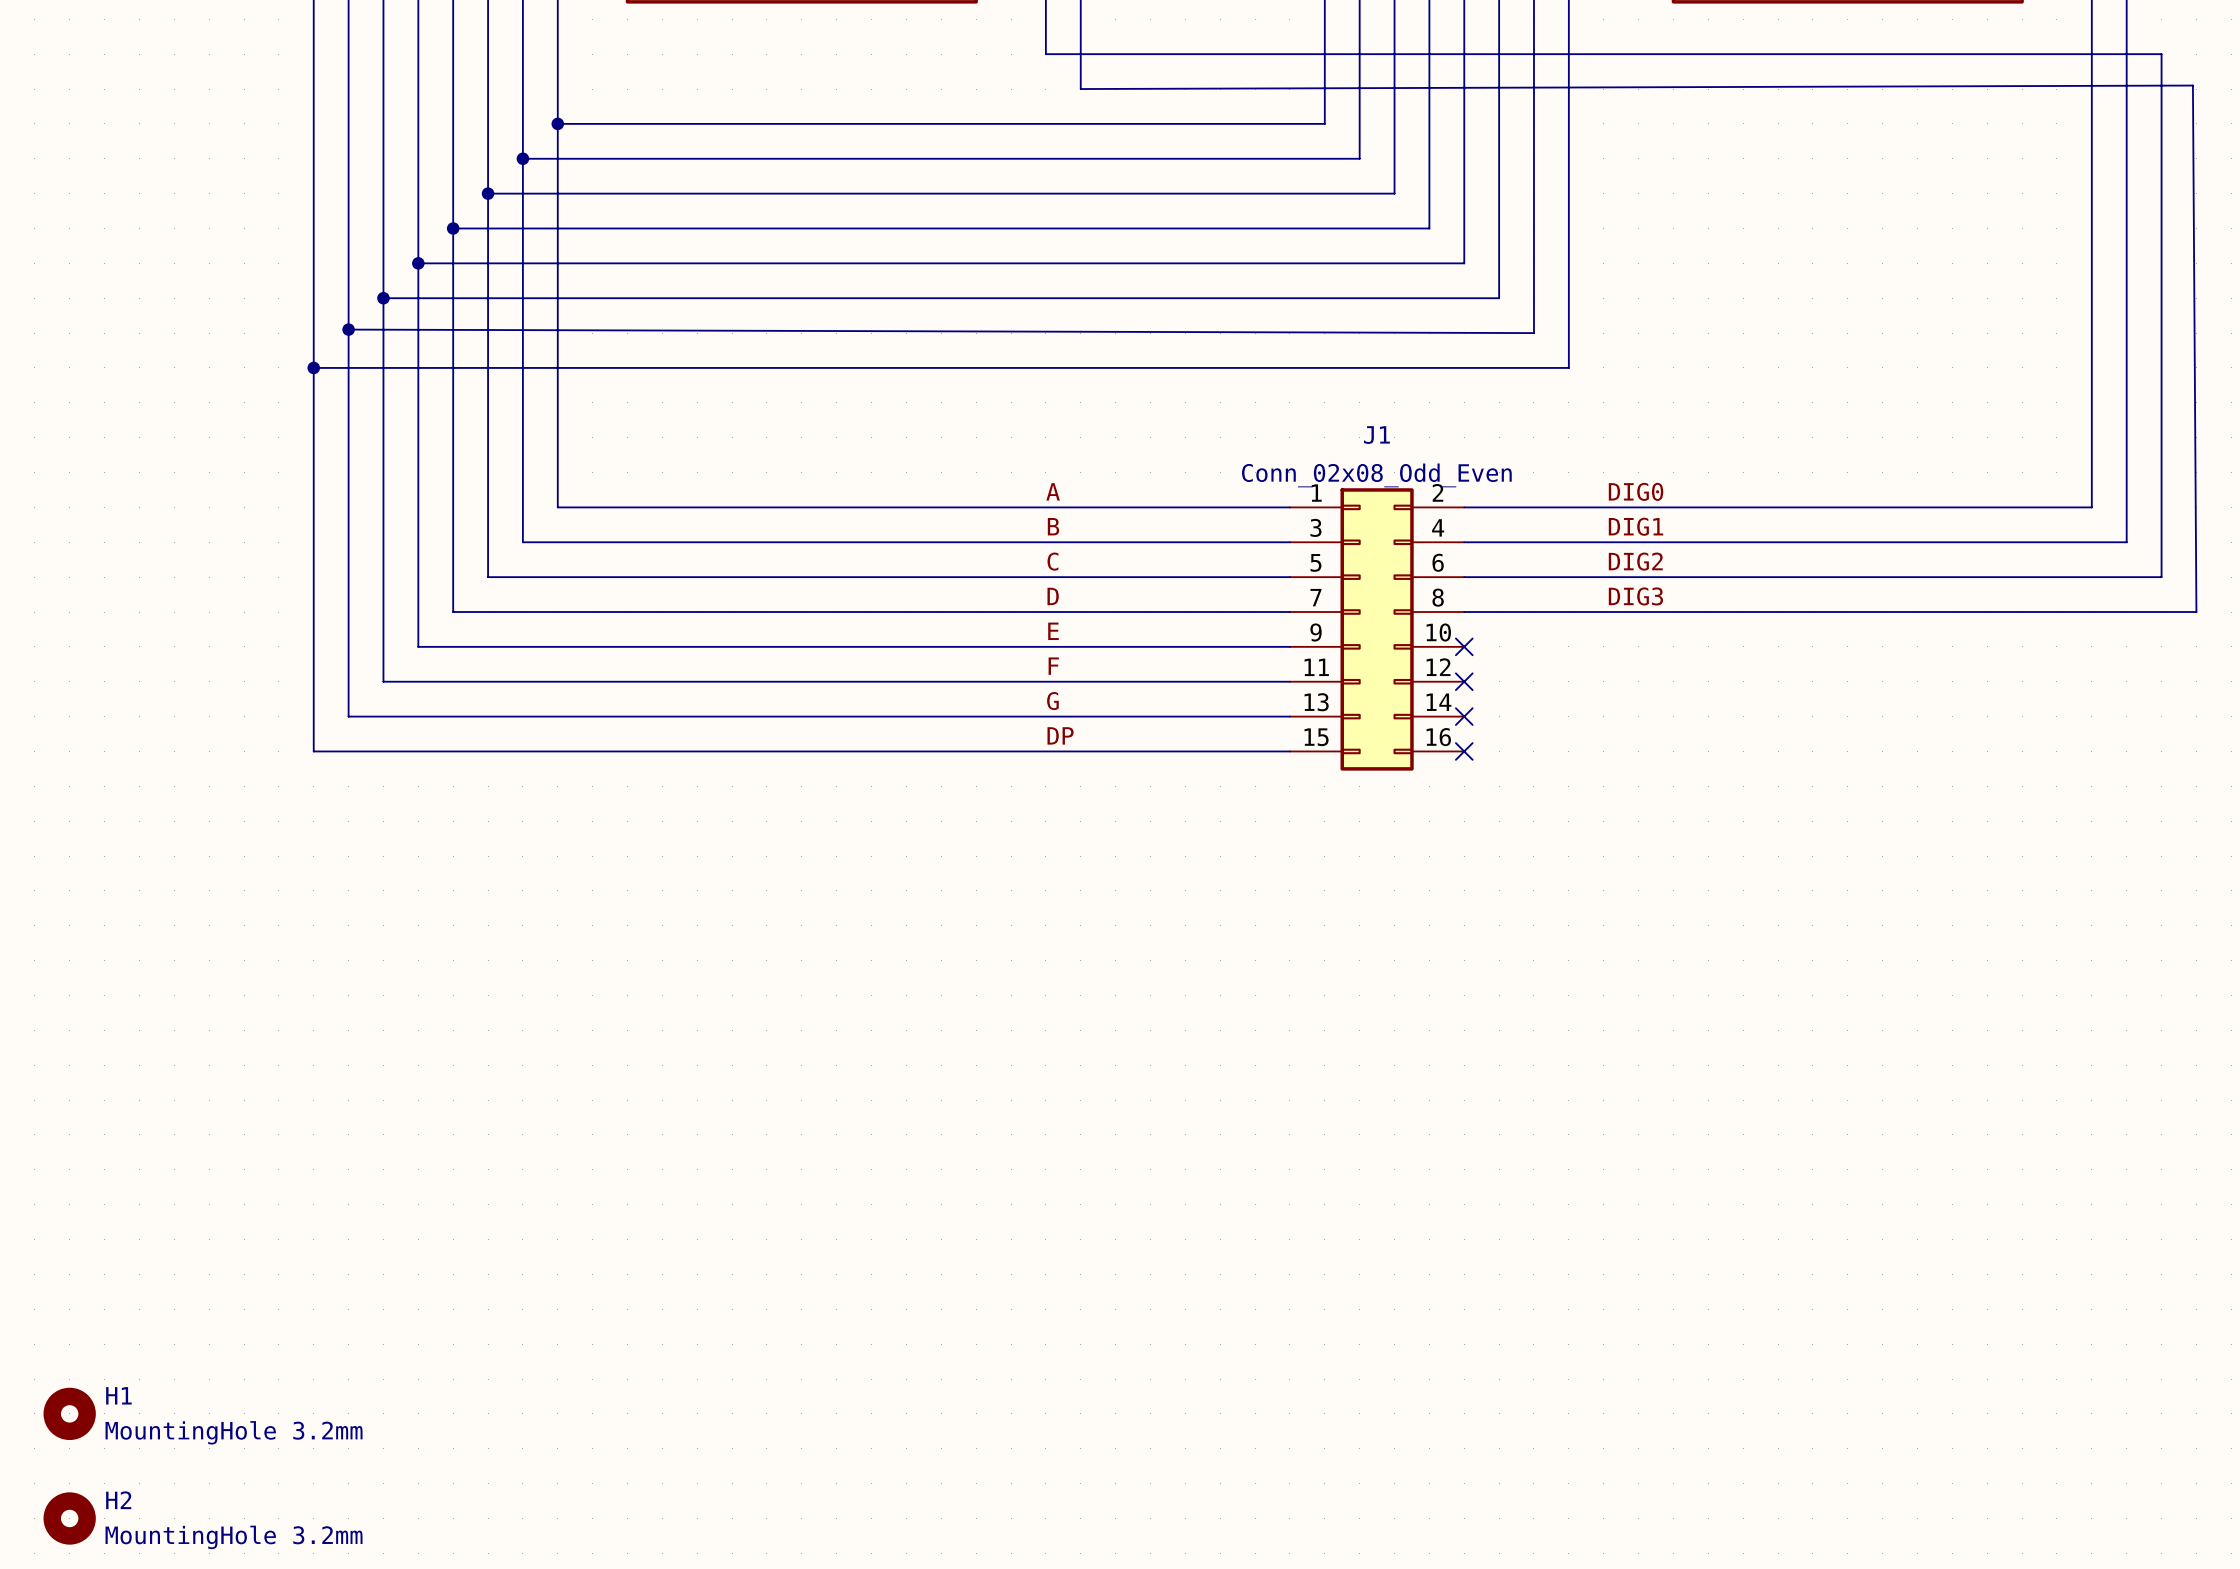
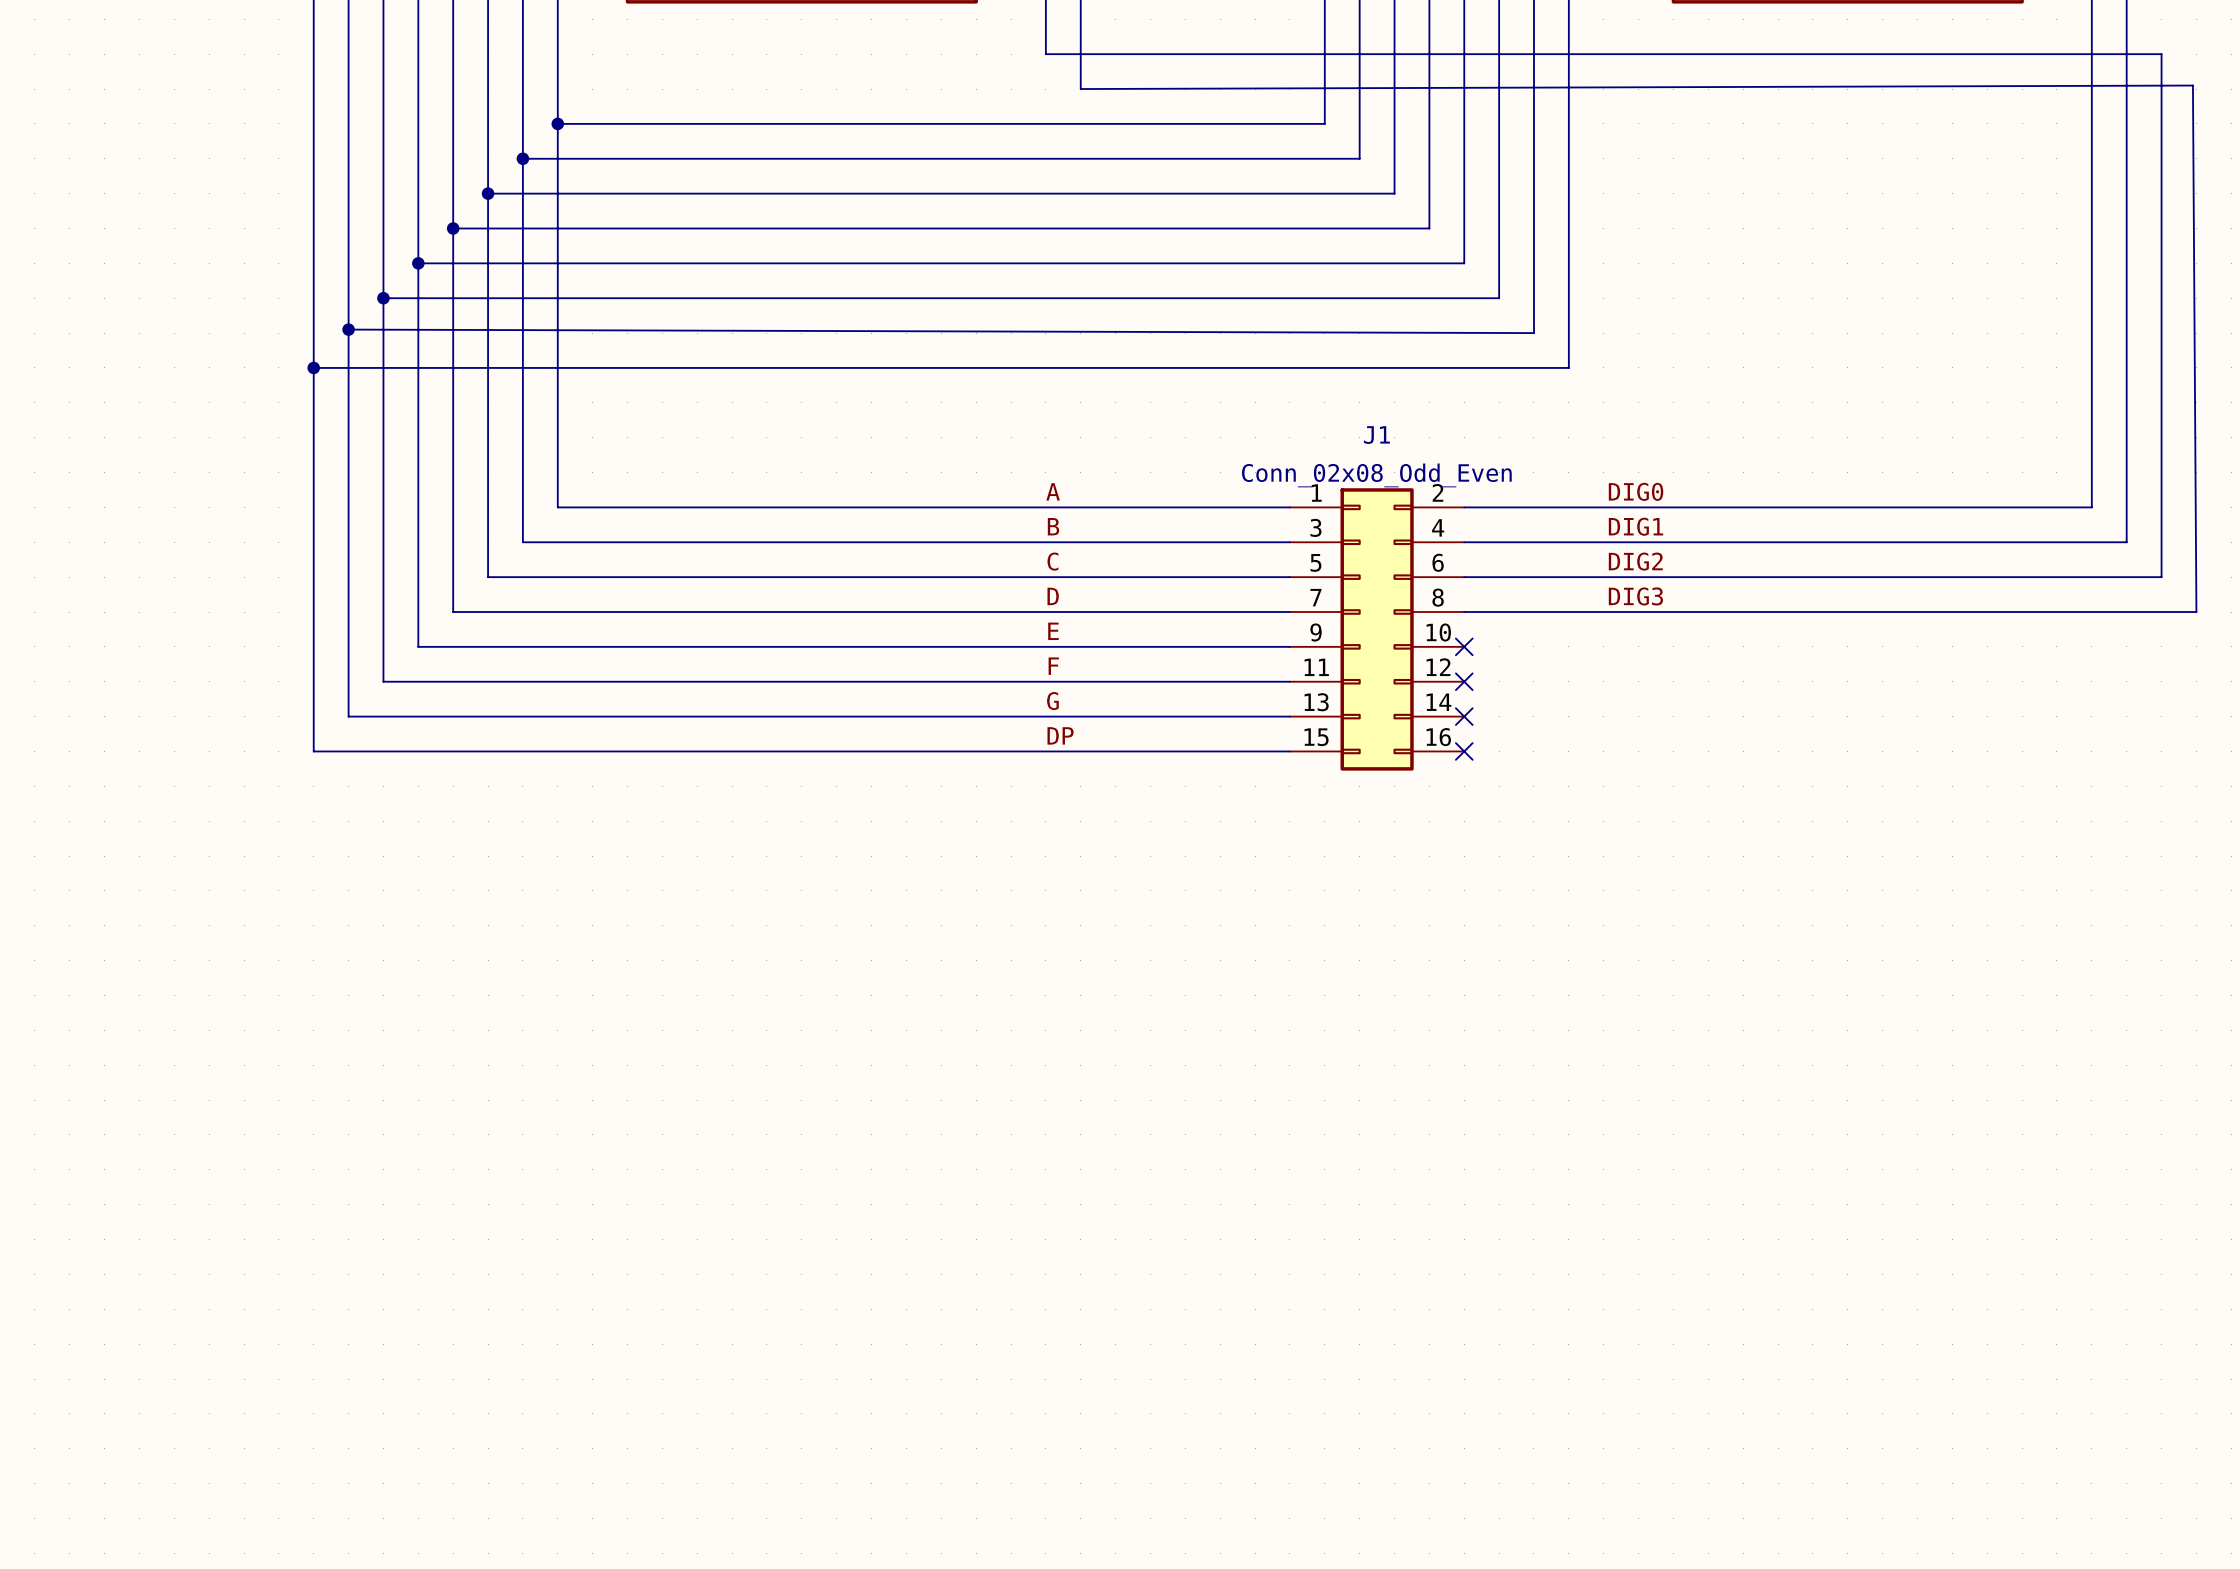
H1: MountingHole 3.2mm (69, 1413) -> none
H2: MountingHole 3.2mm (69, 1518) -> none

